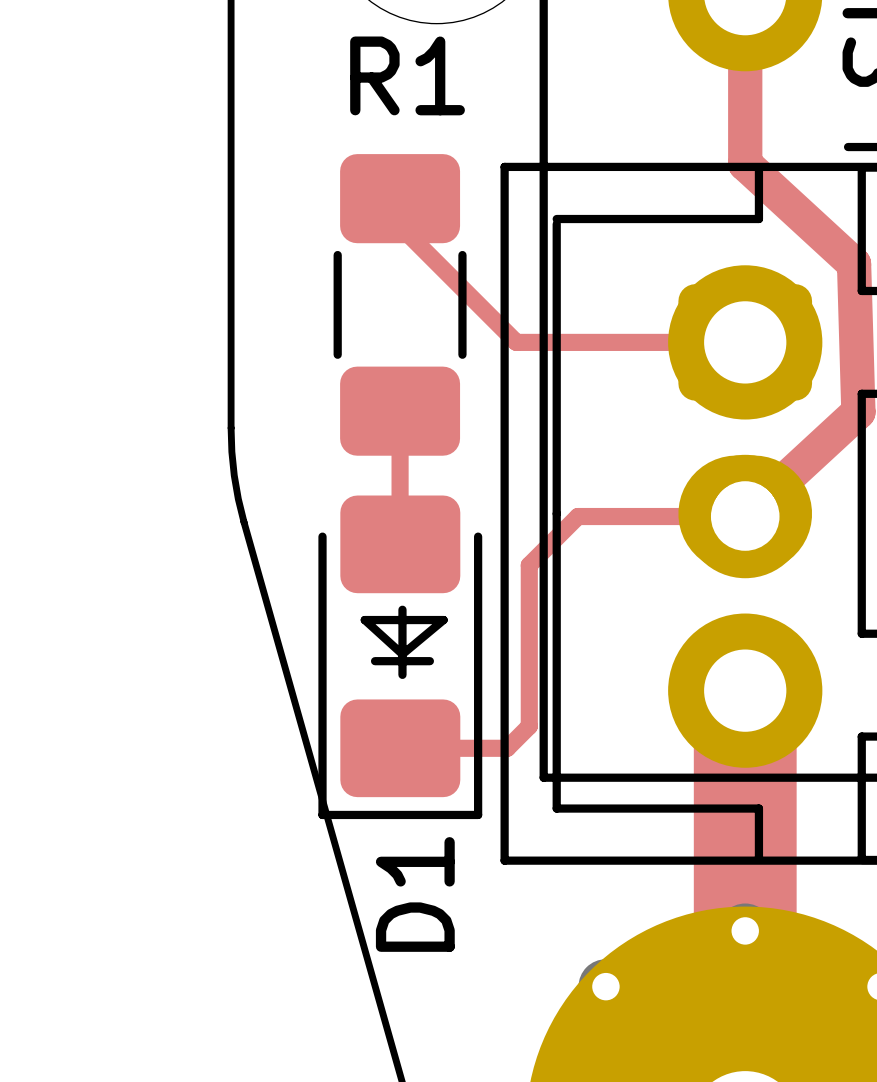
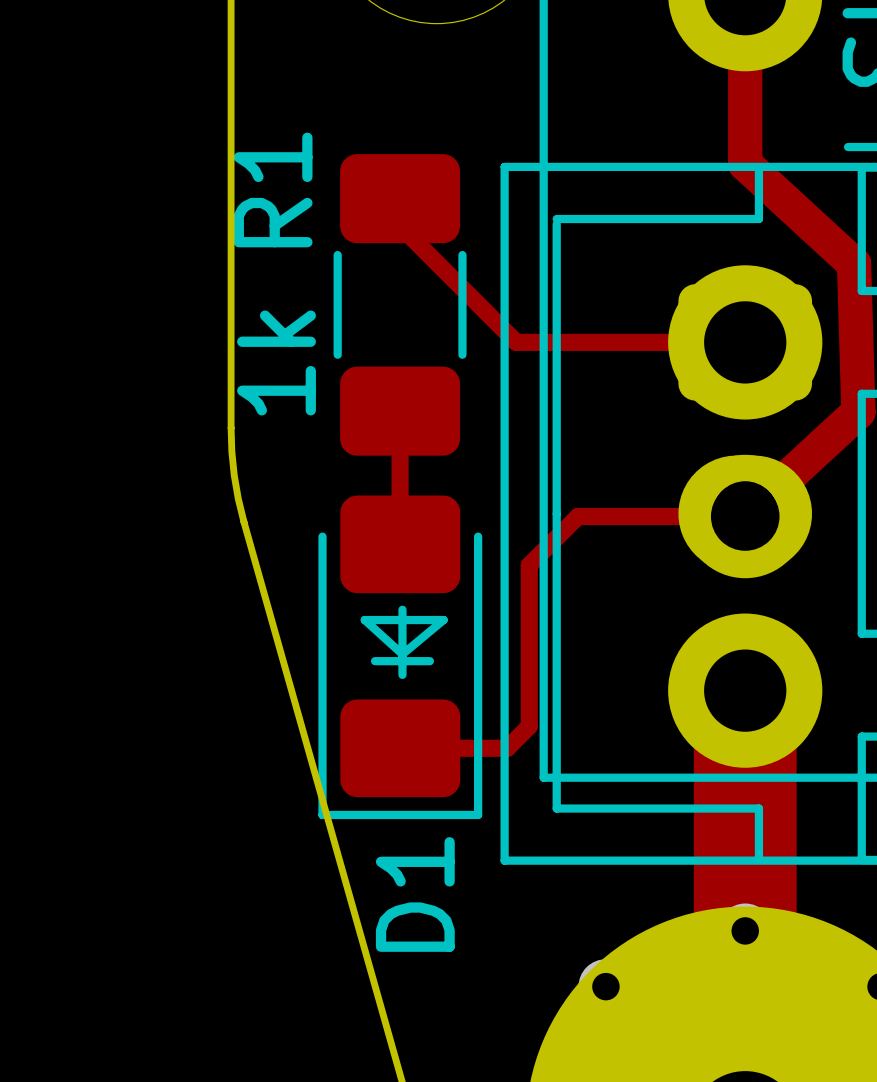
R1 name rotation: 0° (407, 75) -> 90° counterclockwise (273, 189)
text: none -> 1k (276, 362)

